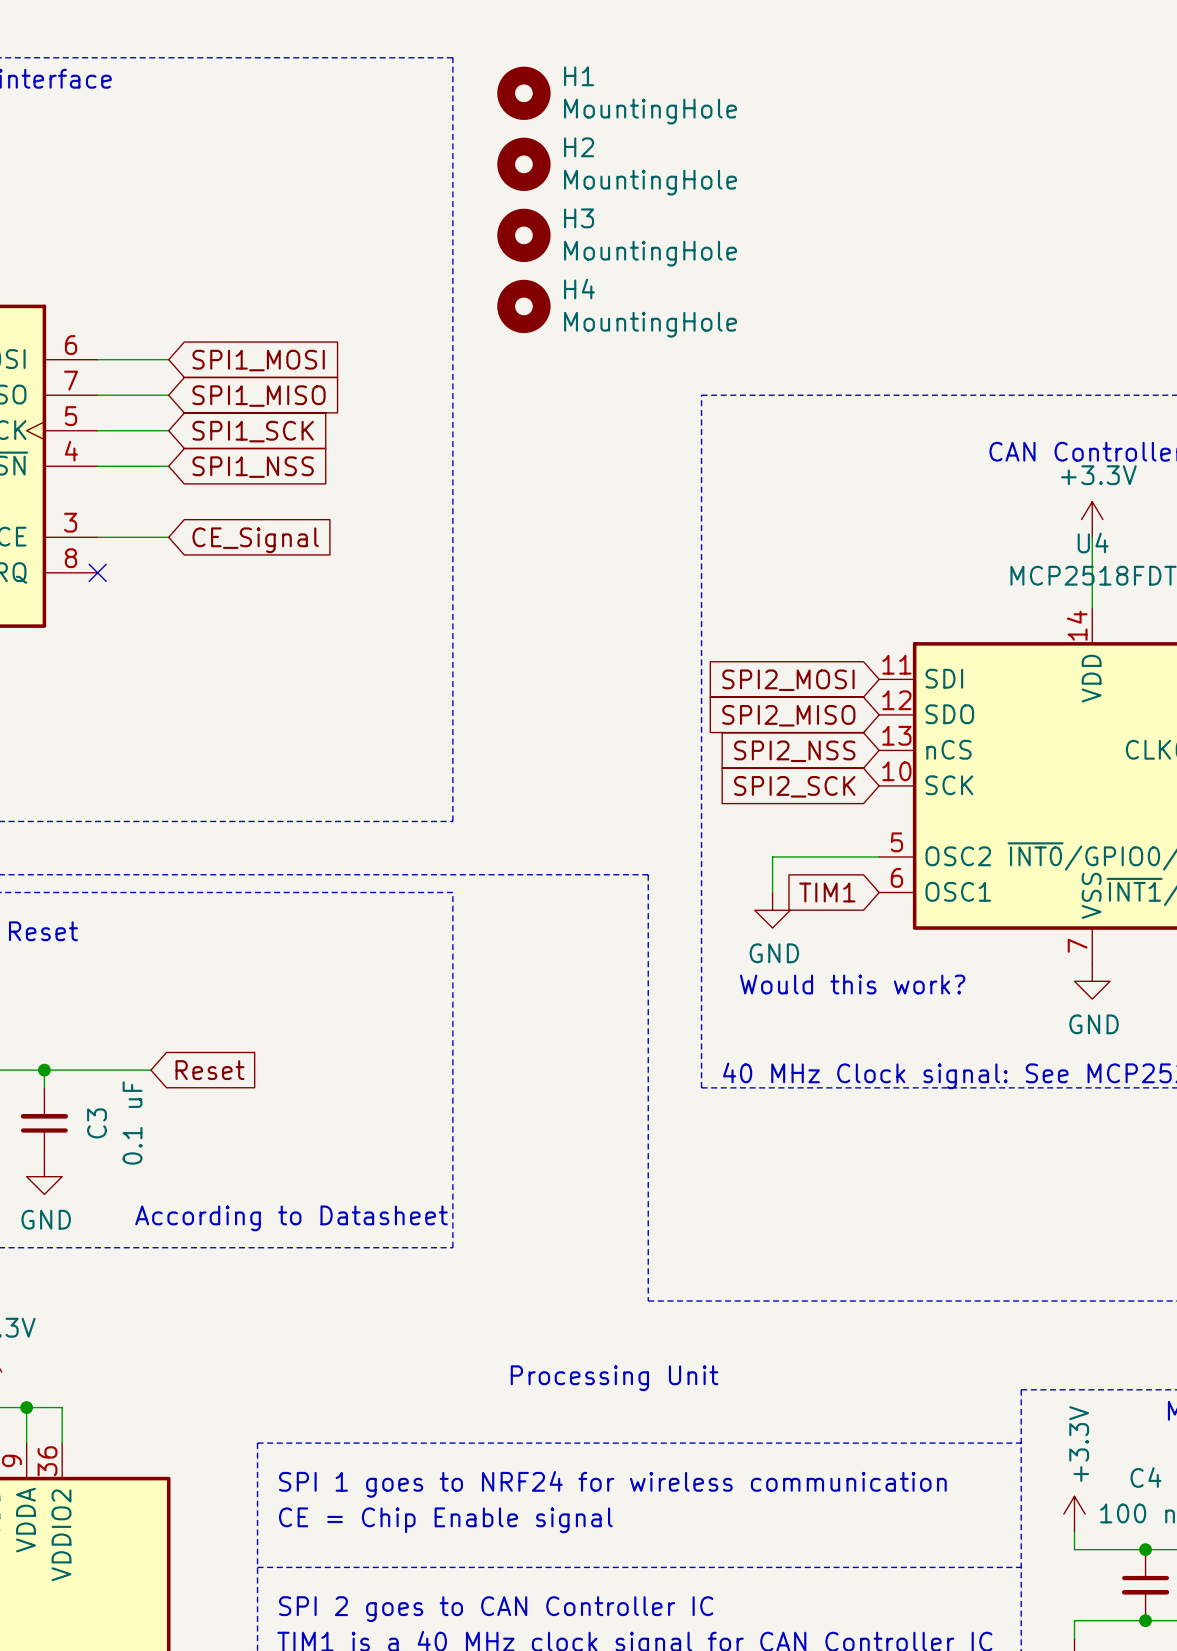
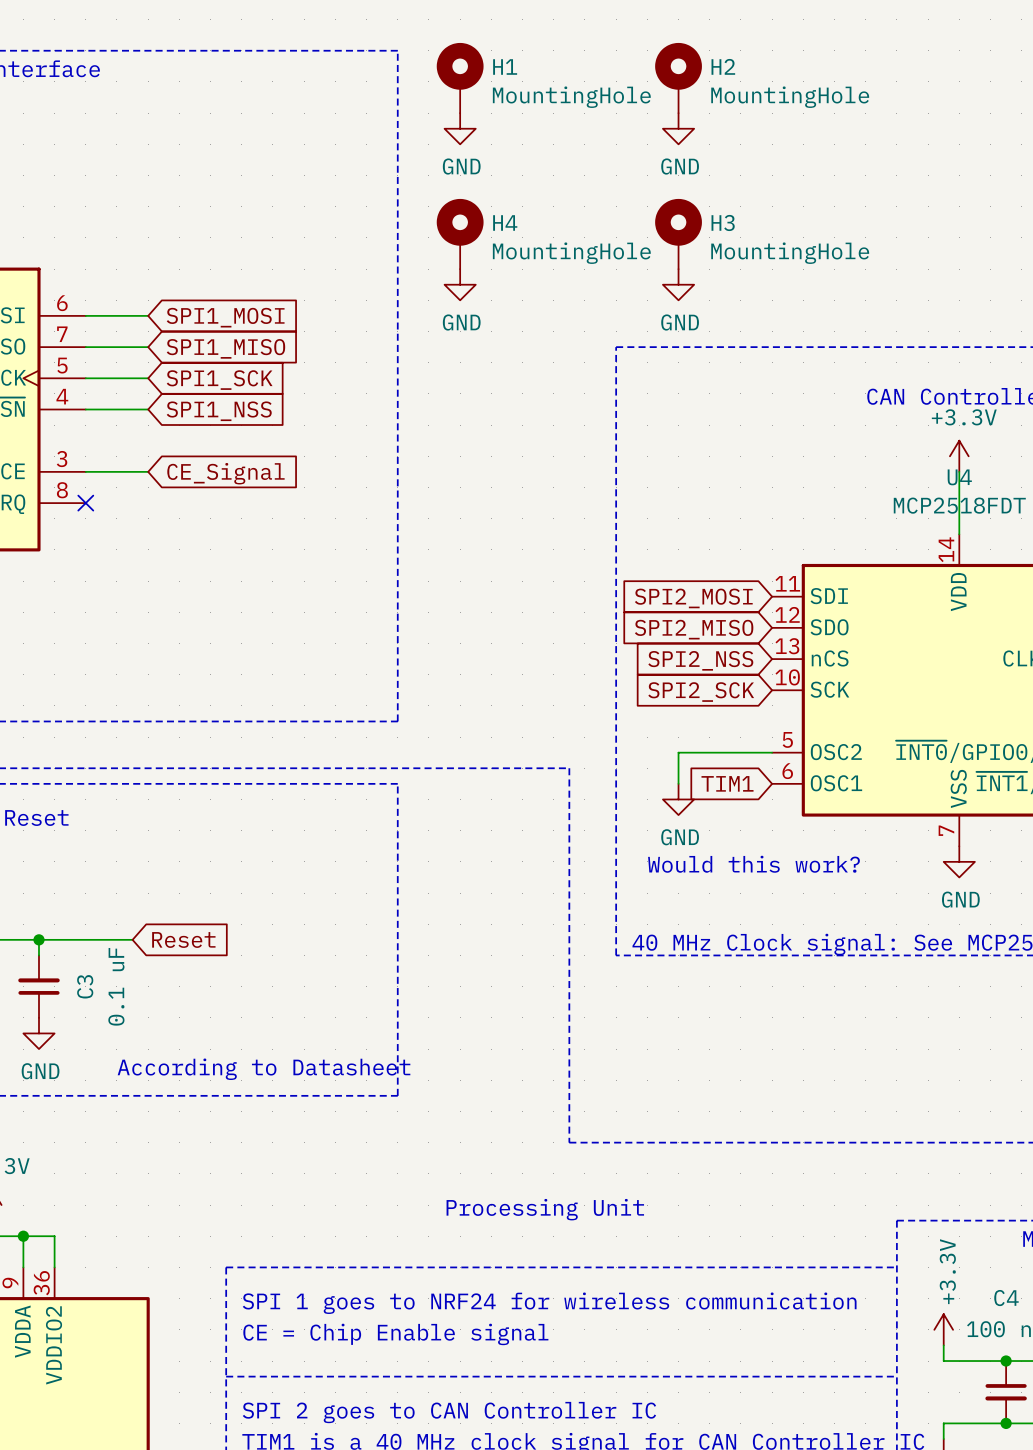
H1 symbol: [497, 66, 551, 120] -> [436, 42, 484, 114]
H2 symbol: [497, 137, 551, 191] -> [655, 42, 702, 114]
power symbol: none -> GND (460, 128)
power symbol: none -> GND (678, 128)
H3 symbol: [497, 208, 551, 263] -> [655, 198, 702, 270]
H4 symbol: [497, 279, 551, 334] -> [436, 198, 484, 270]
power symbol: none -> GND (460, 284)
power symbol: none -> GND (678, 284)

